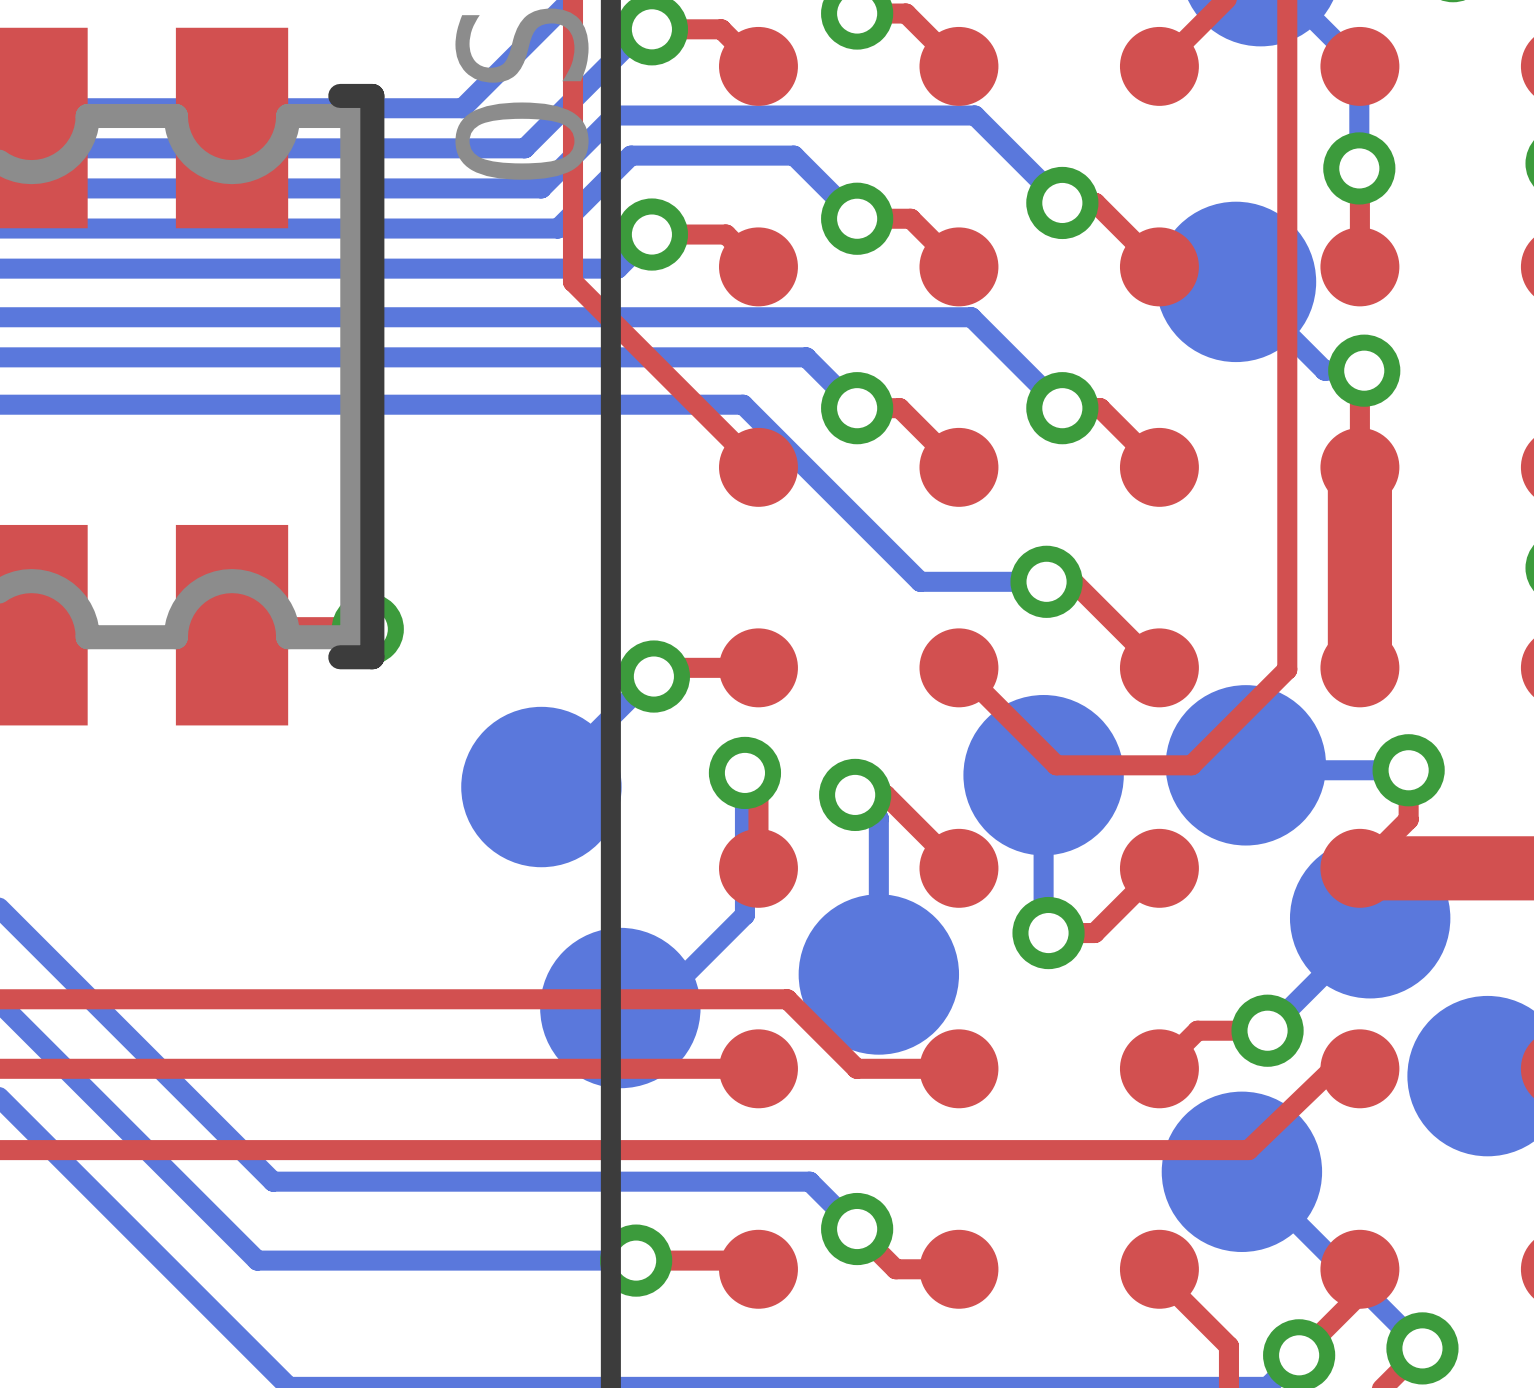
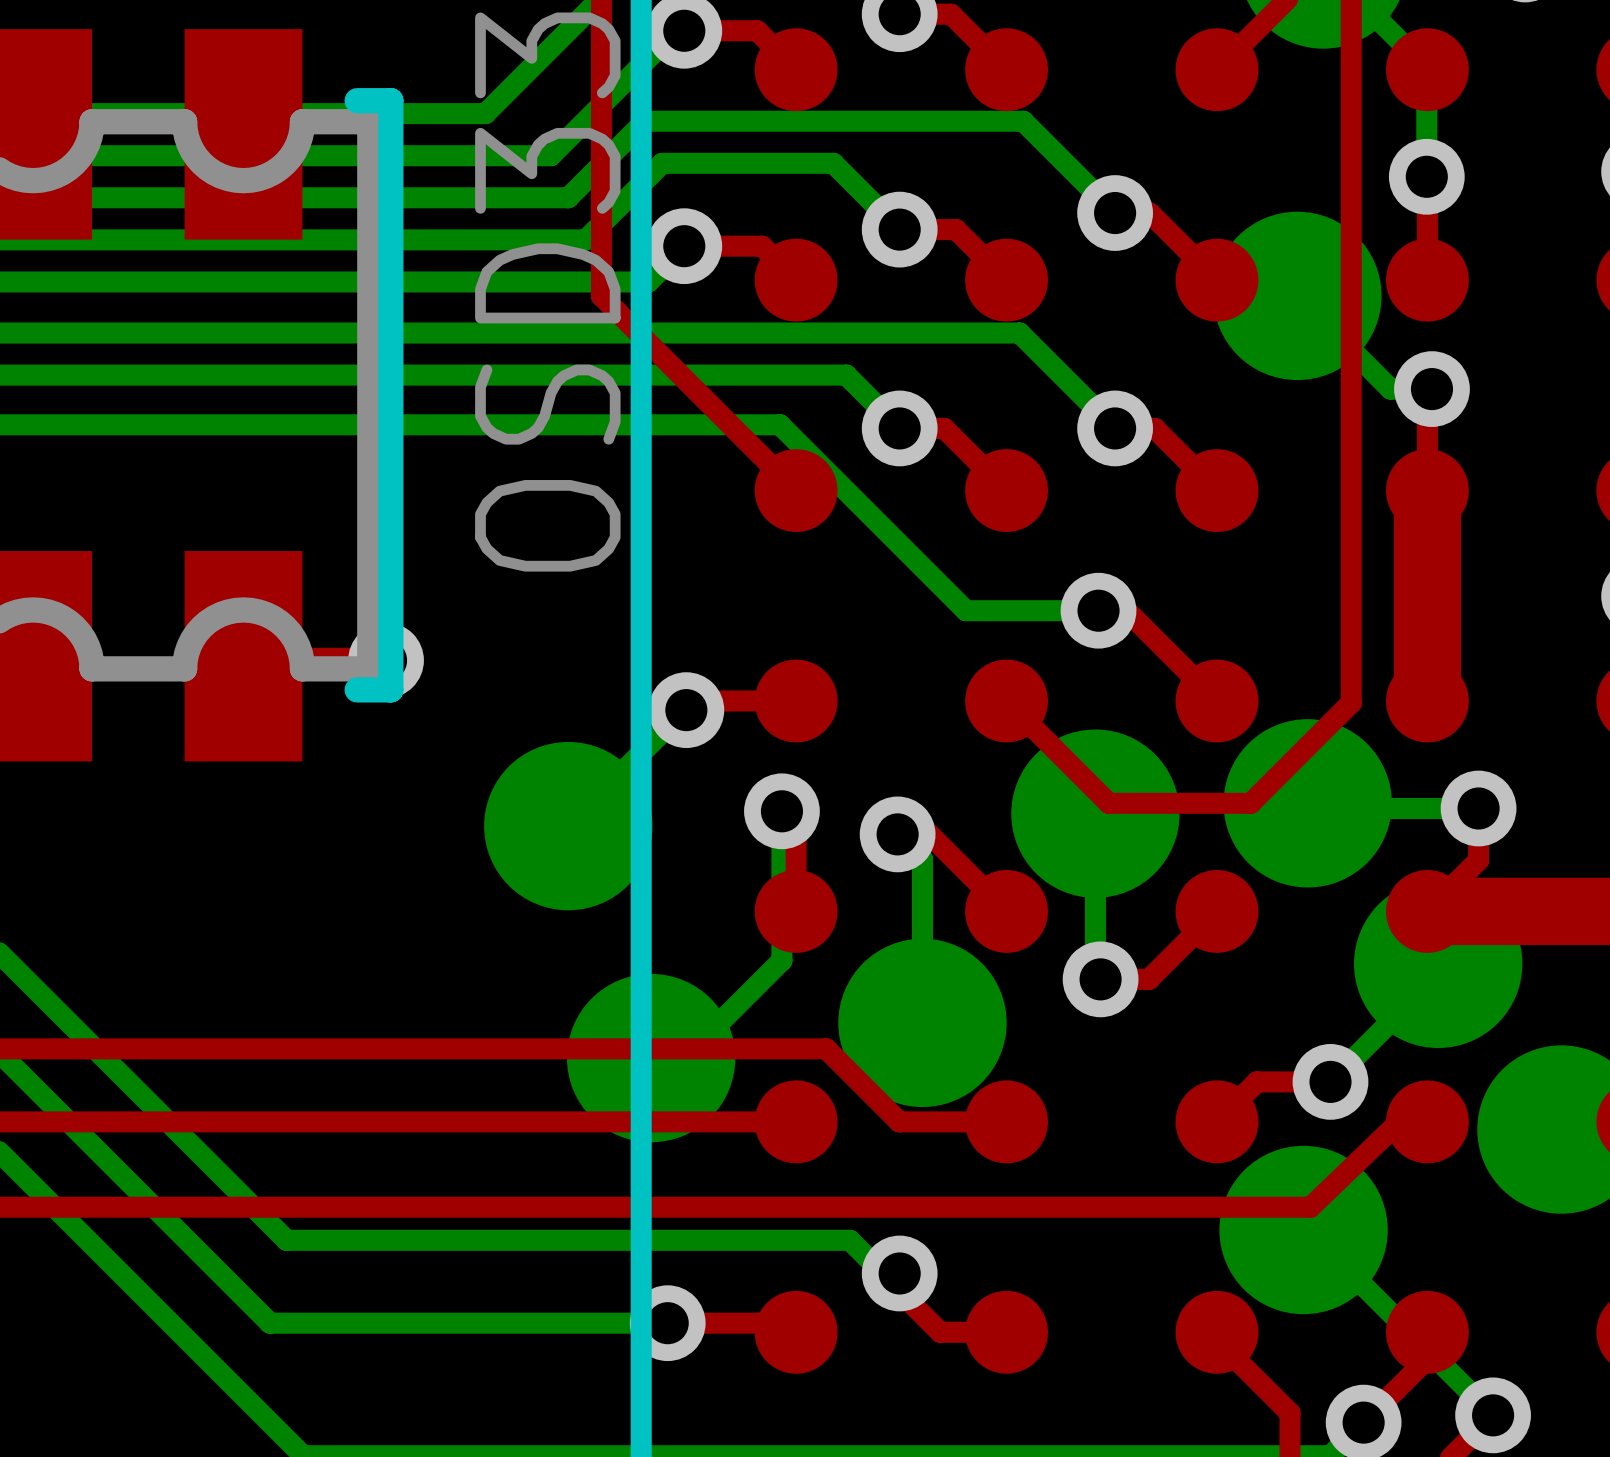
via position: (857, 1229) -> (899, 1273)

